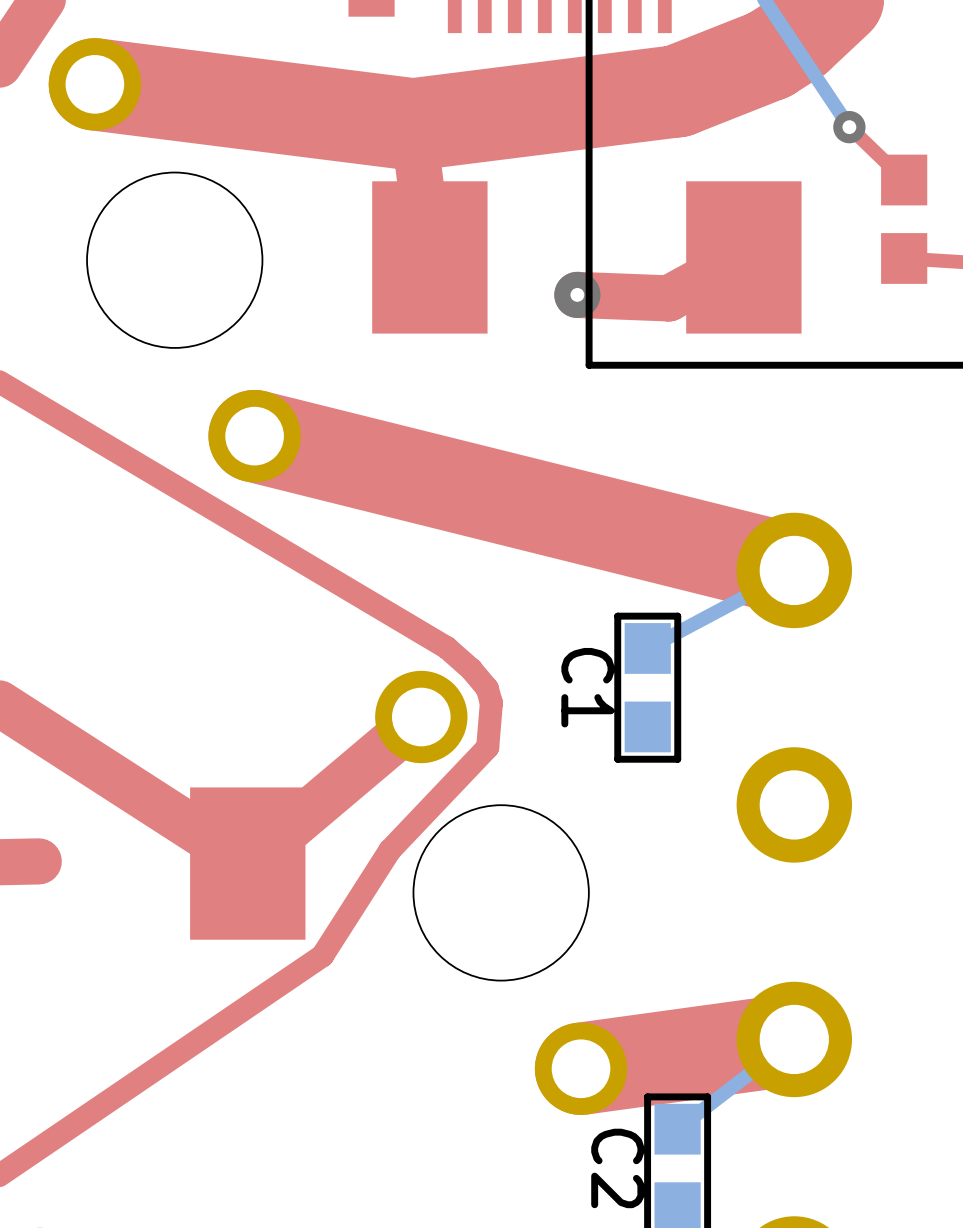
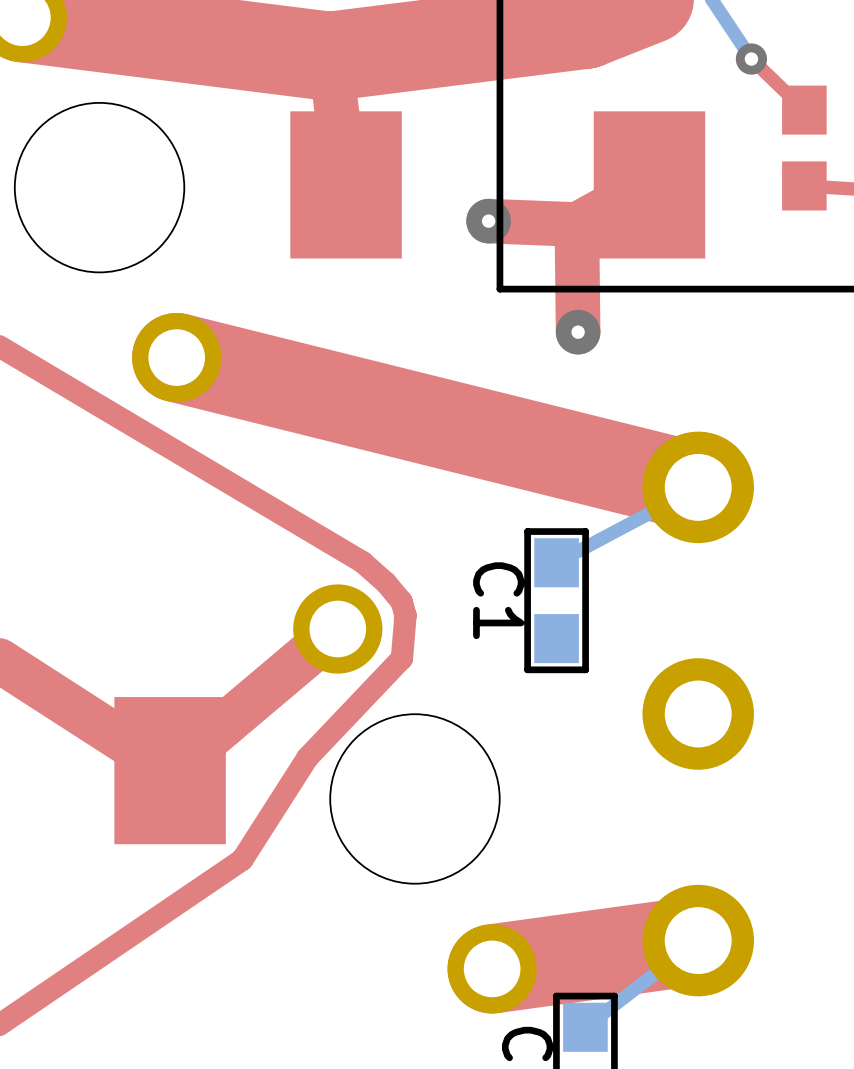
top track: none -> (576, 224) (578, 332)
via: none -> (578, 332)

